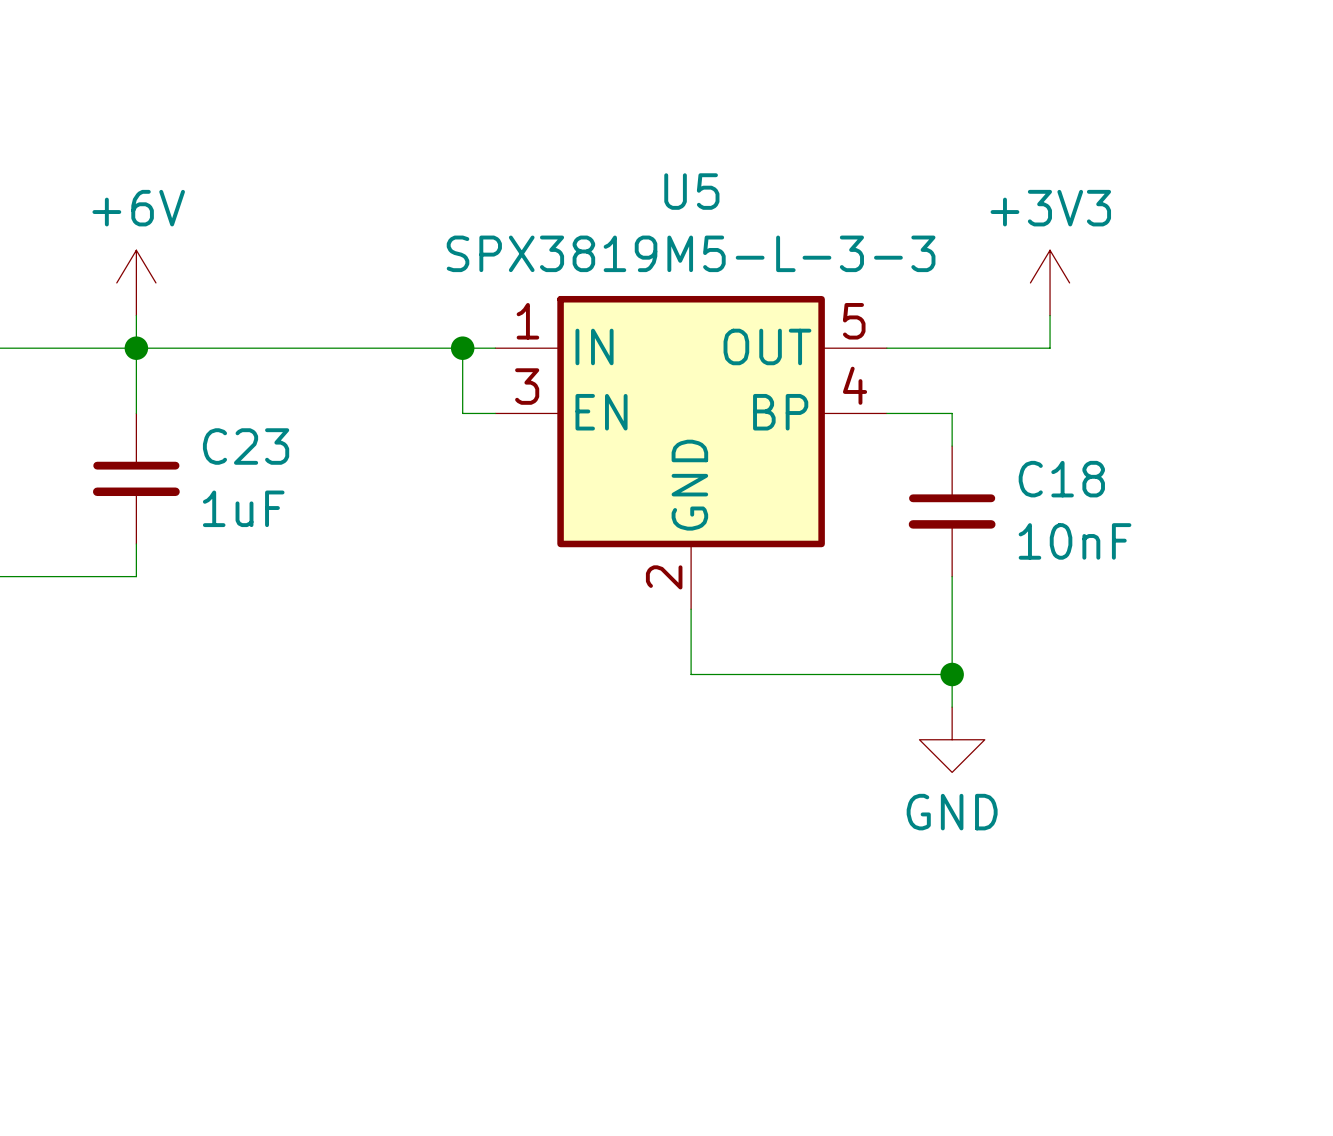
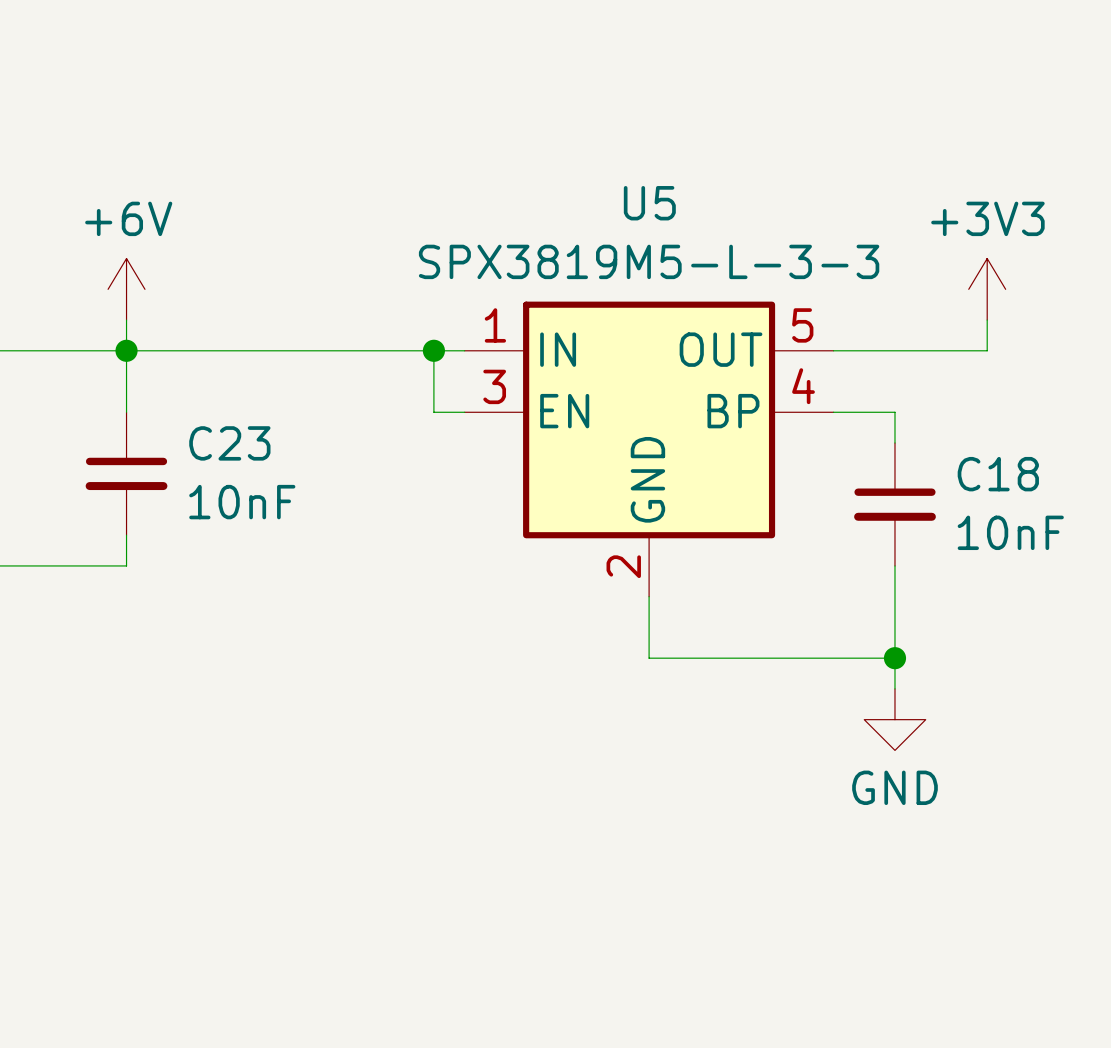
C23 value: 1uF (243, 508) -> 10nF (242, 502)

